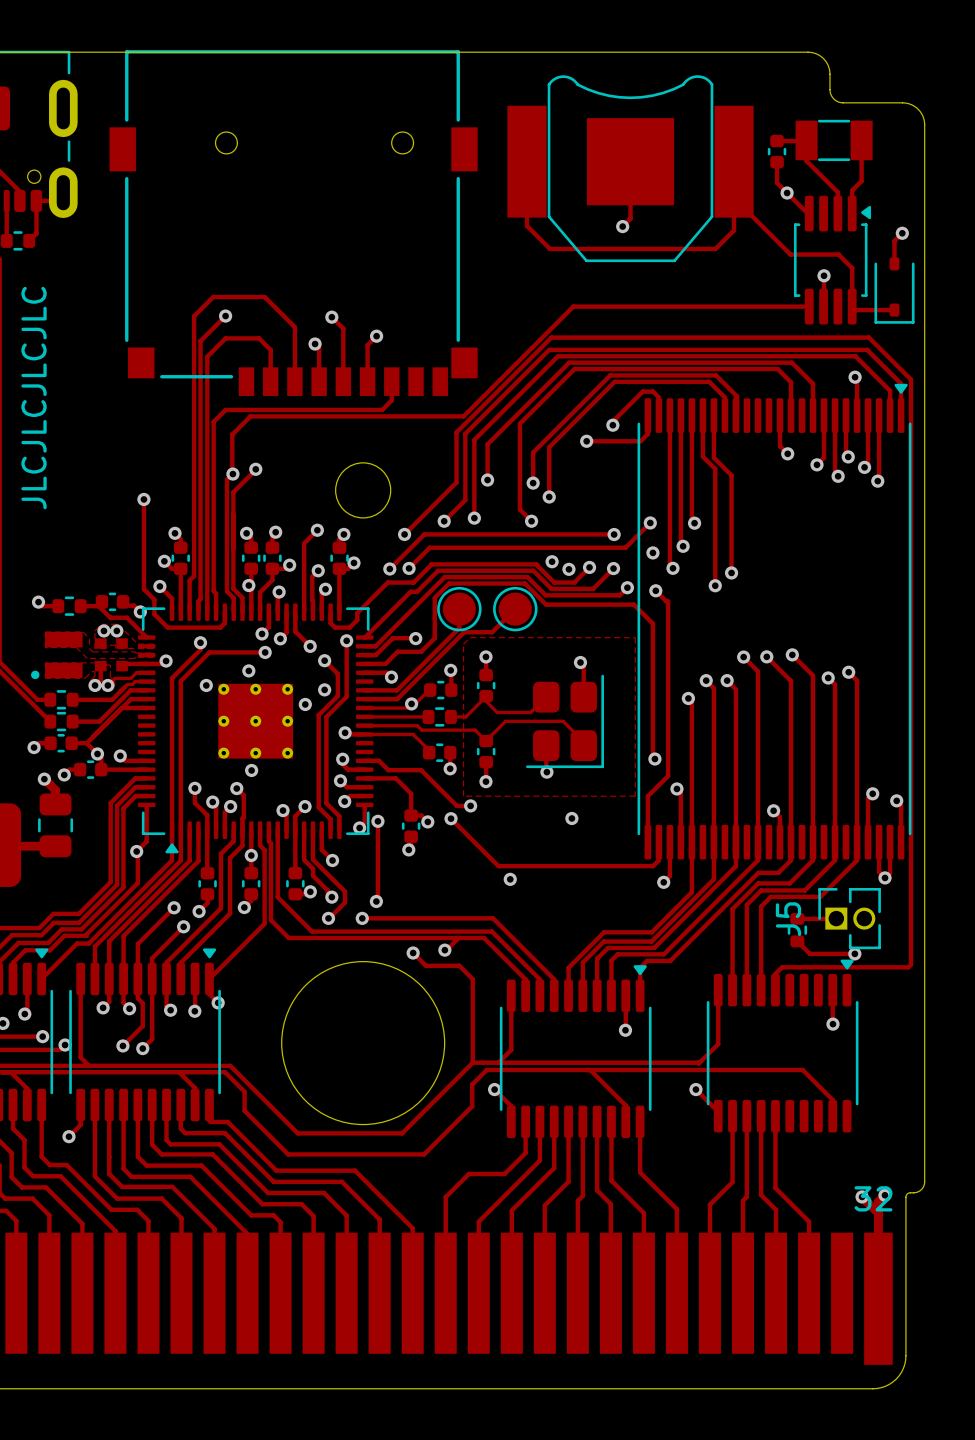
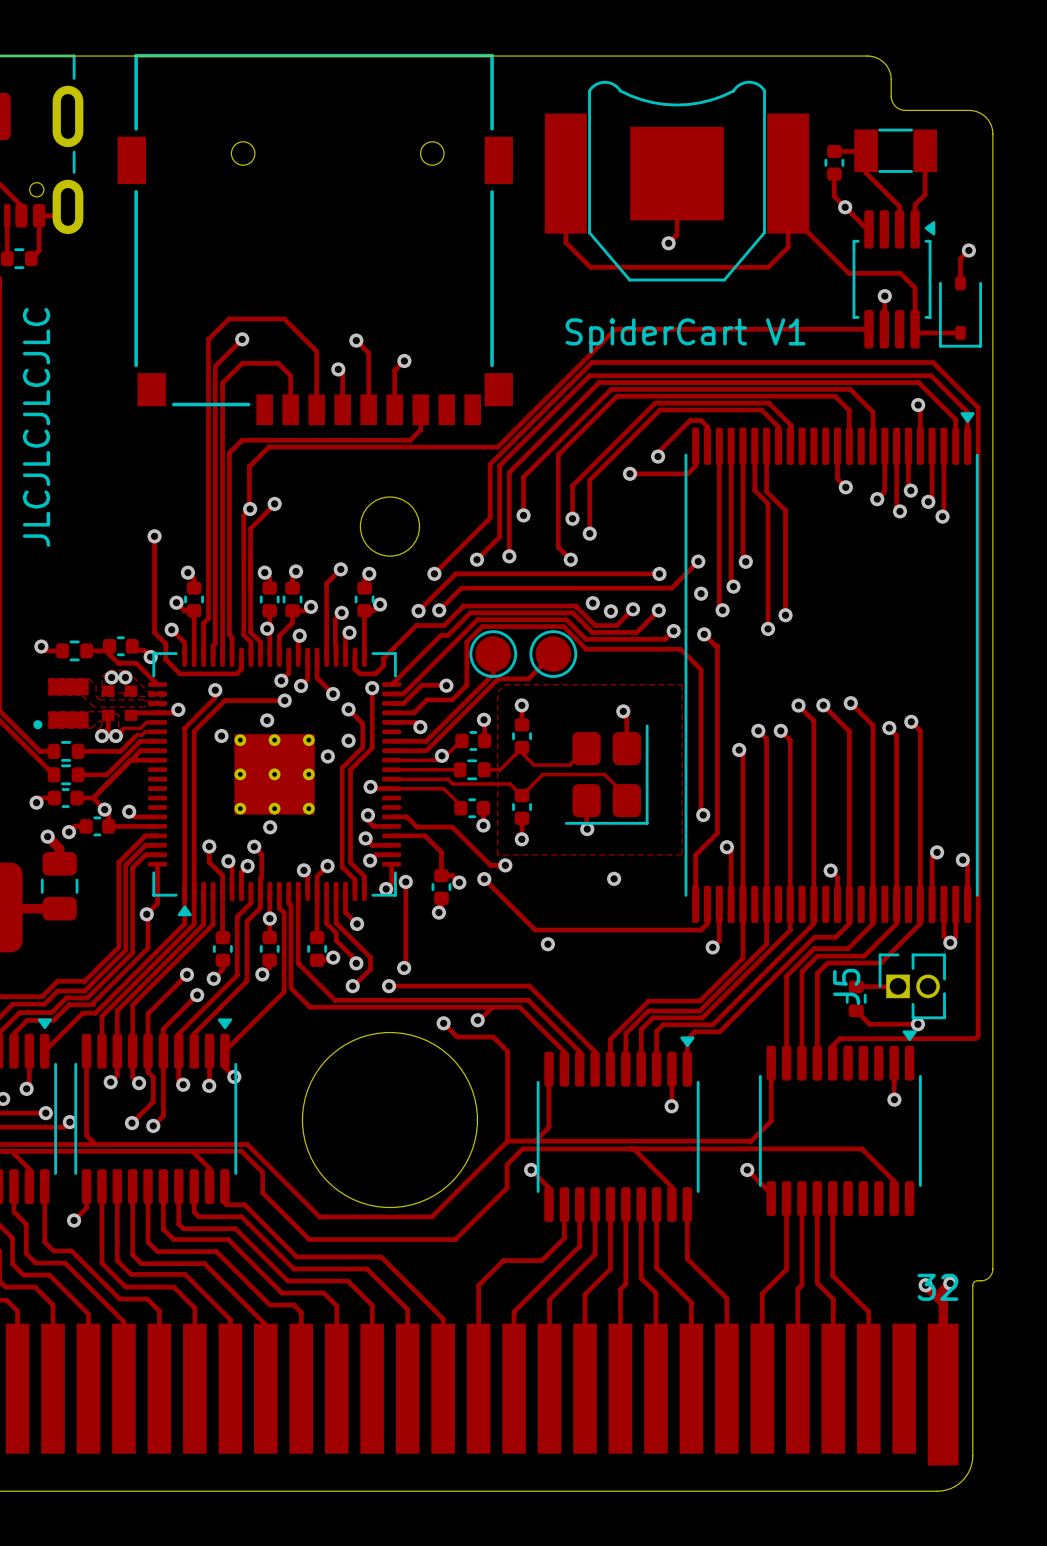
text: none -> SpiderCart V1 (685, 335)

